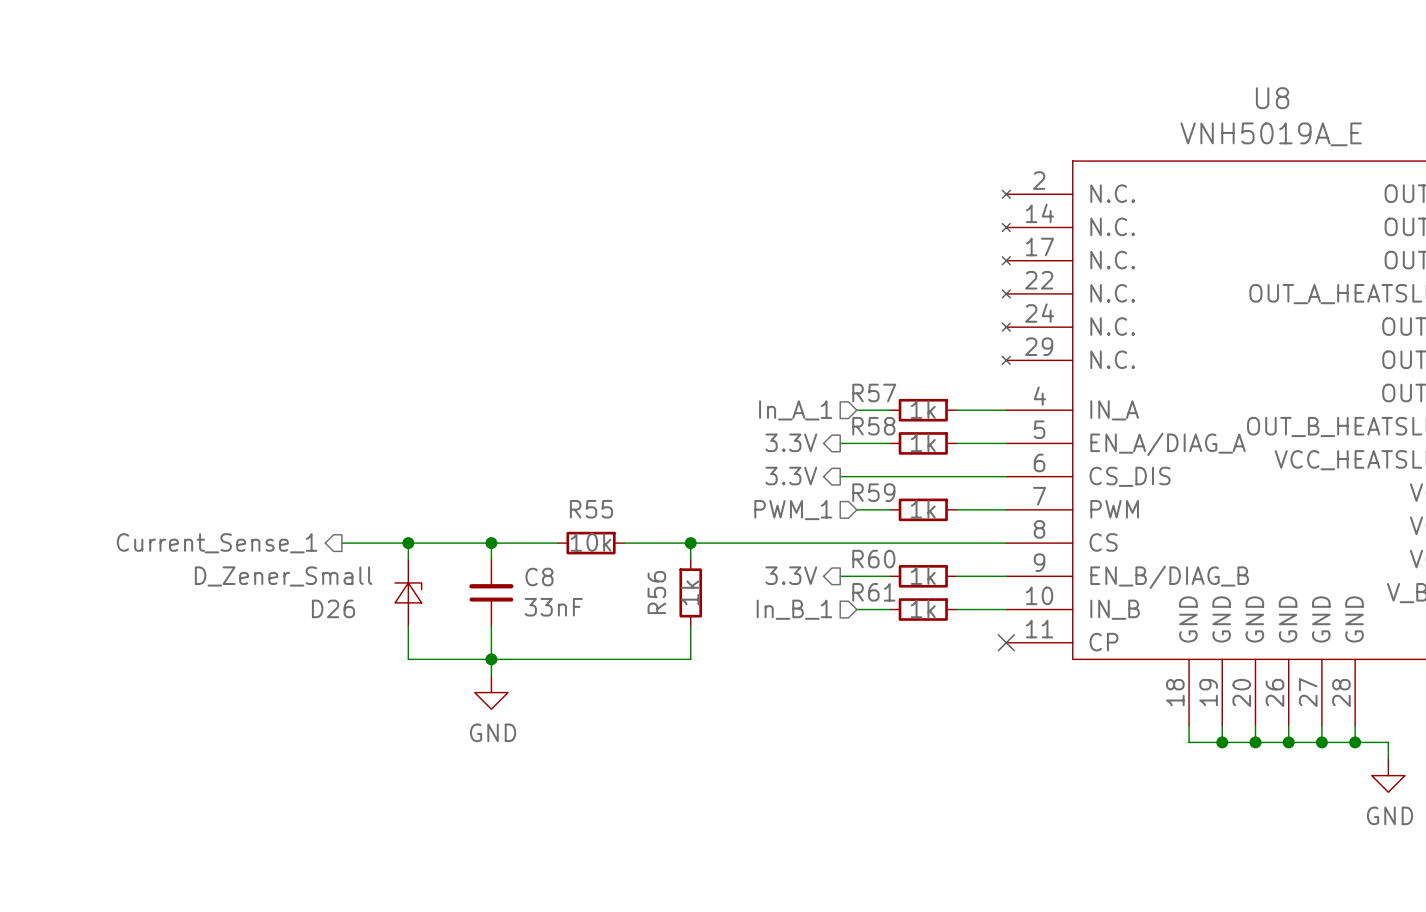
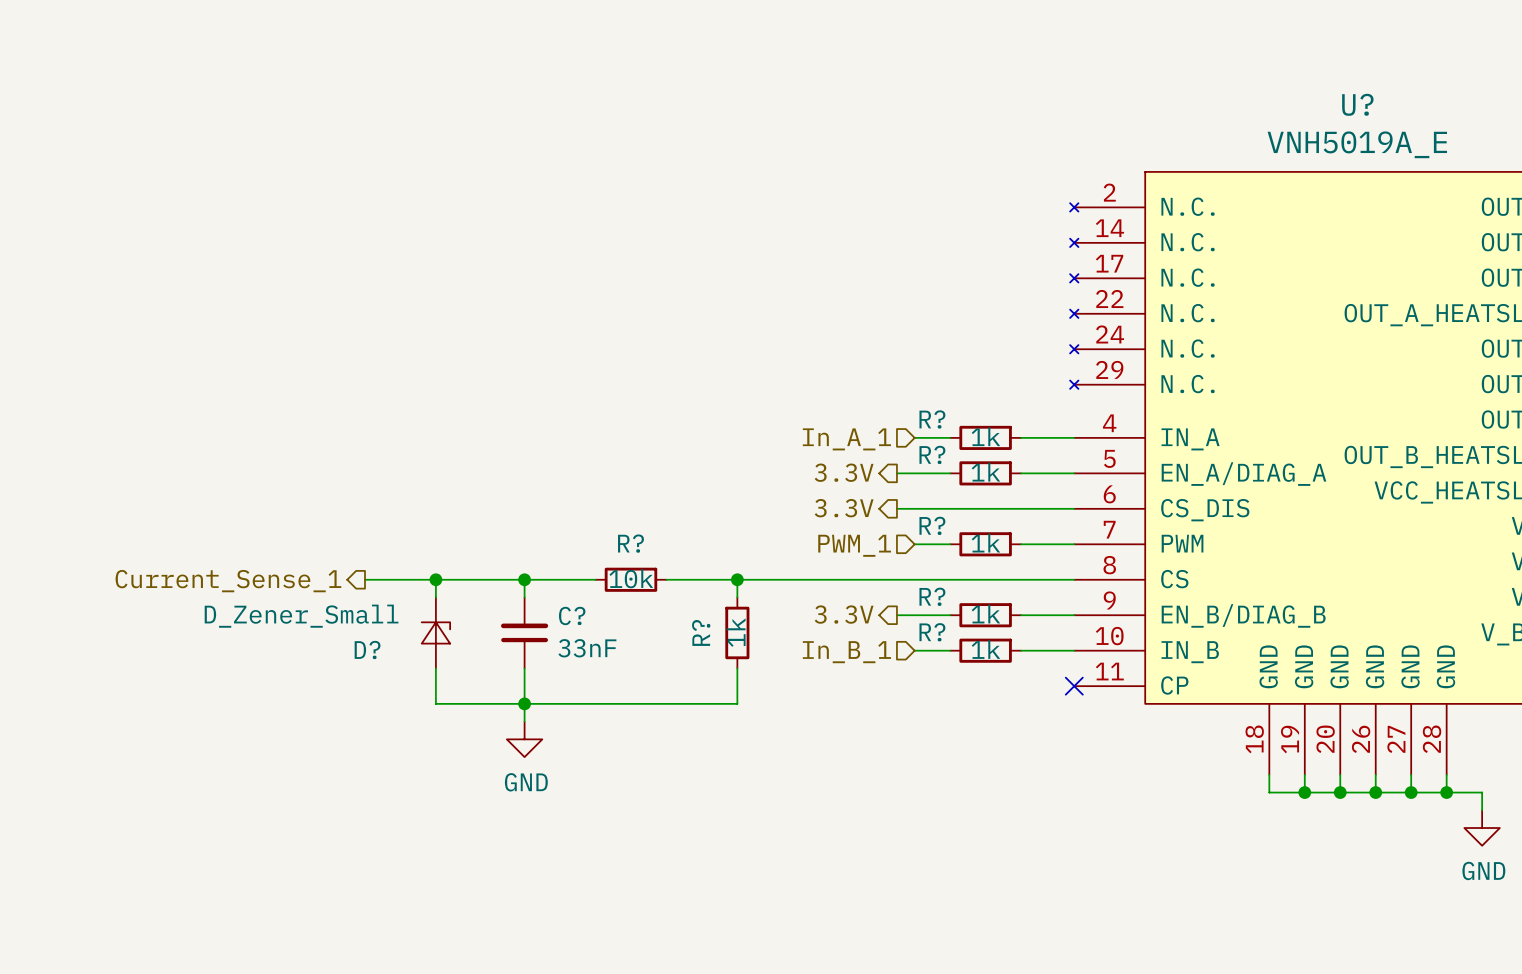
U8 name: U8 (1272, 98) -> U? (1357, 104)
R57 name: R57 (874, 392) -> R? (932, 419)
R58 name: R58 (873, 426) -> R? (932, 454)
R59 name: R59 (873, 492) -> R? (932, 525)
R55 name: R55 (591, 509) -> R? (630, 543)
R60 name: R60 (873, 559) -> R? (932, 596)
C8 name: C8 (539, 577) -> C? (572, 615)
R56 name: R56 (656, 592) -> R? (701, 632)
R61 name: R61 (873, 592) -> R? (932, 632)
D26 name: D26 (333, 608) -> D? (367, 649)

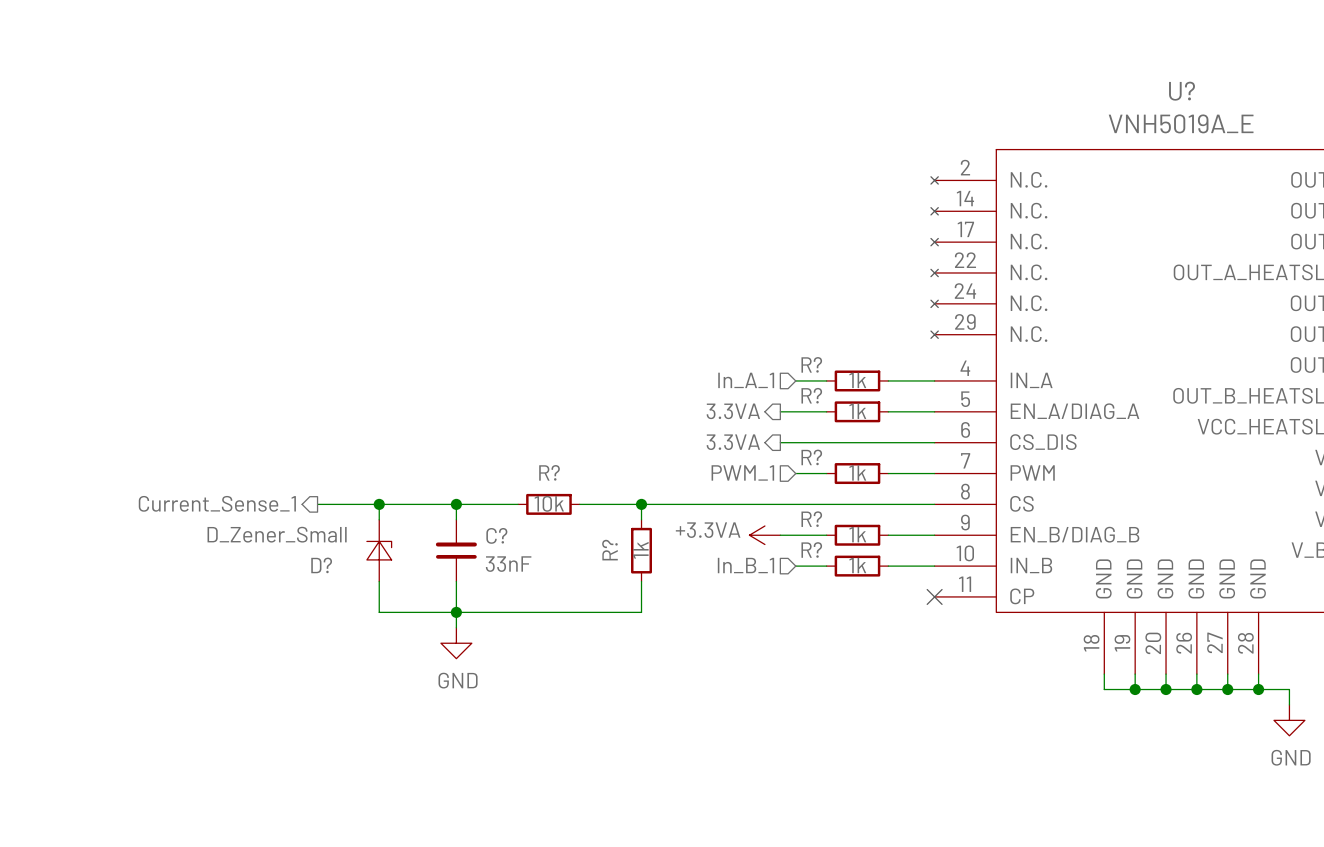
hierarchical label: 3.3V (844, 472) -> 3.3VA (733, 411)
hierarchical label: 3.3V (844, 508) -> 3.3VA (733, 442)
hierarchical label: 3.3V (844, 614) -> none
power symbol: none -> +3.3VA (764, 535)

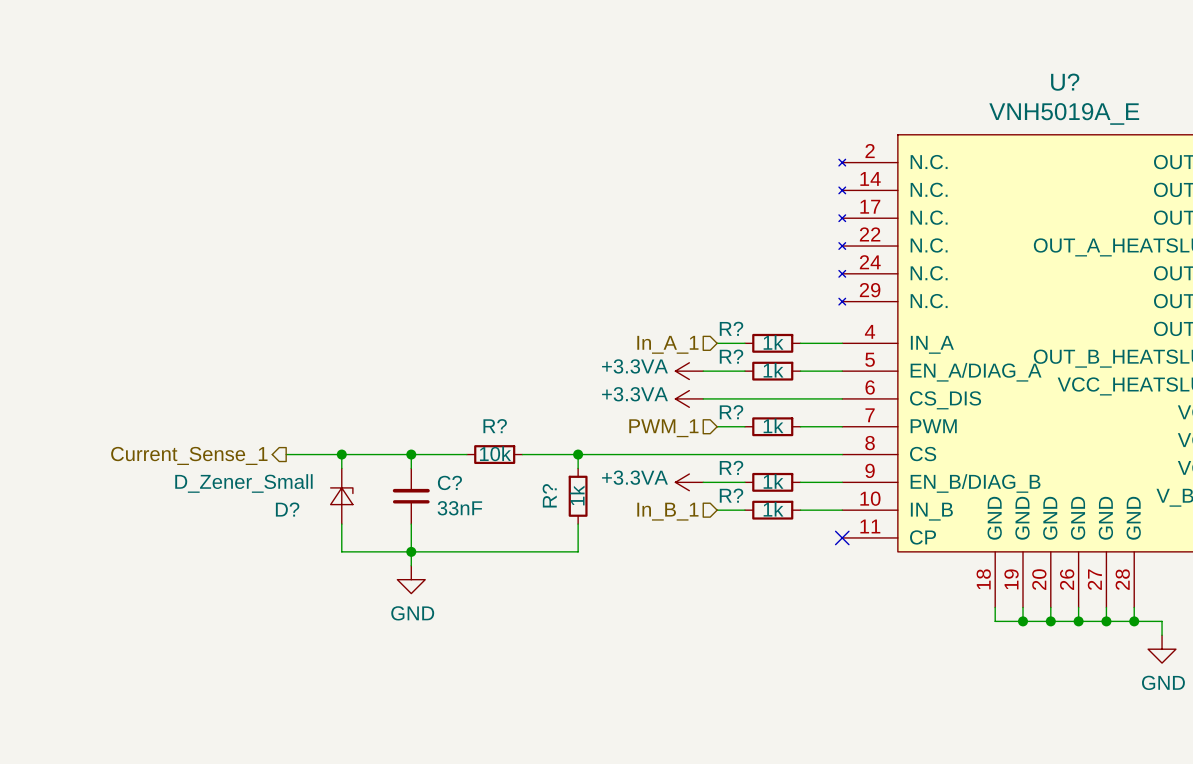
hierarchical label: 3.3VA (733, 411) -> none
power symbol: none -> +3.3VA (689, 371)
hierarchical label: 3.3VA (733, 442) -> none
power symbol: none -> +3.3VA (689, 398)

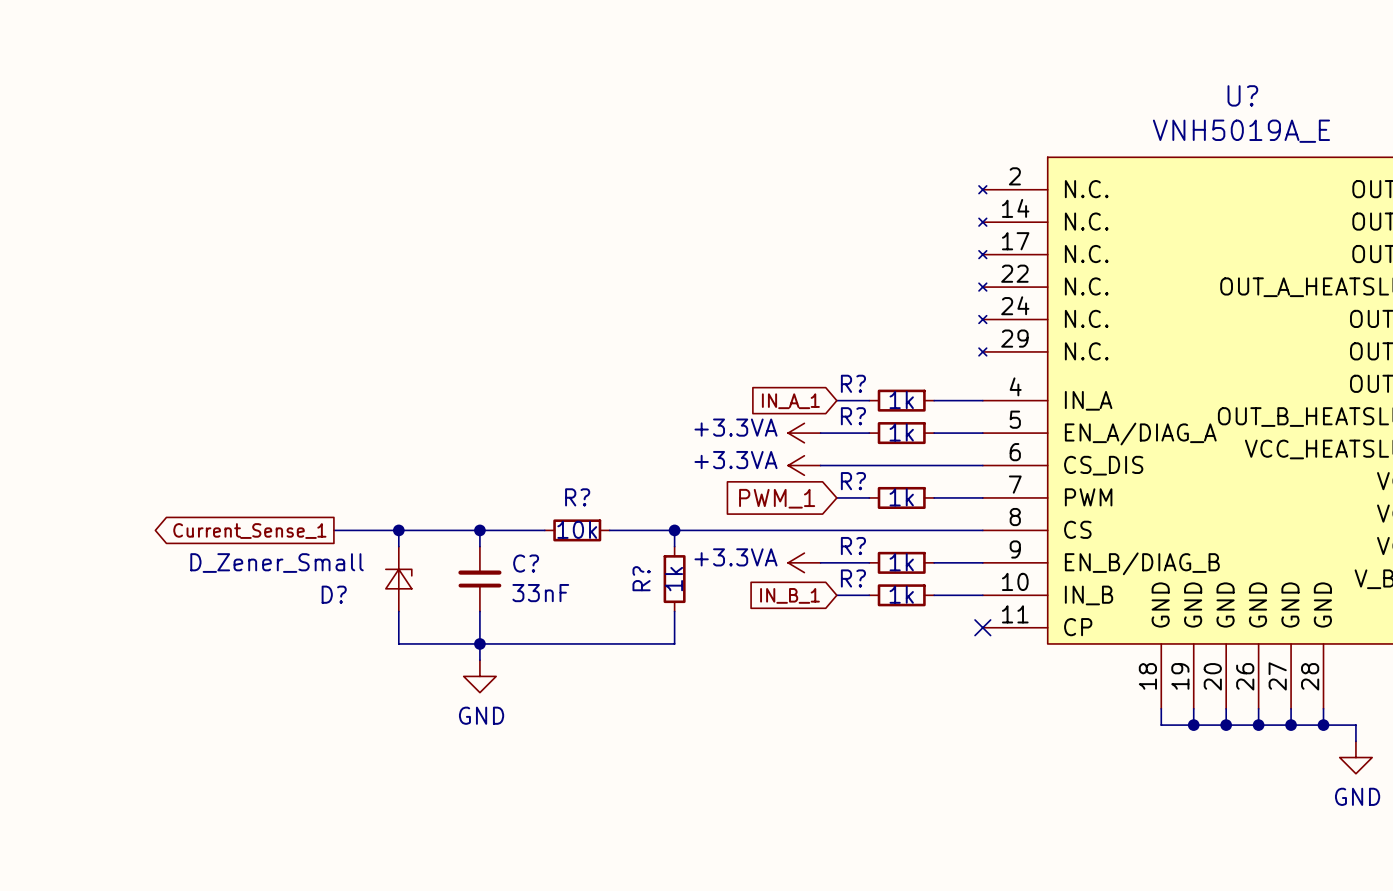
hierarchical label: In_A_1 (667, 344) -> none
global label: none -> IN_A_1 (790, 401)
hierarchical label: PWM_1 (663, 428) -> none
global label: none -> PWM_1 (777, 498)
hierarchical label: Current_Sense_1 (189, 455) -> none
global label: none -> Current_Sense_1 (249, 531)
hierarchical label: In_B_1 (667, 511) -> none
global label: none -> IN_B_1 (789, 595)

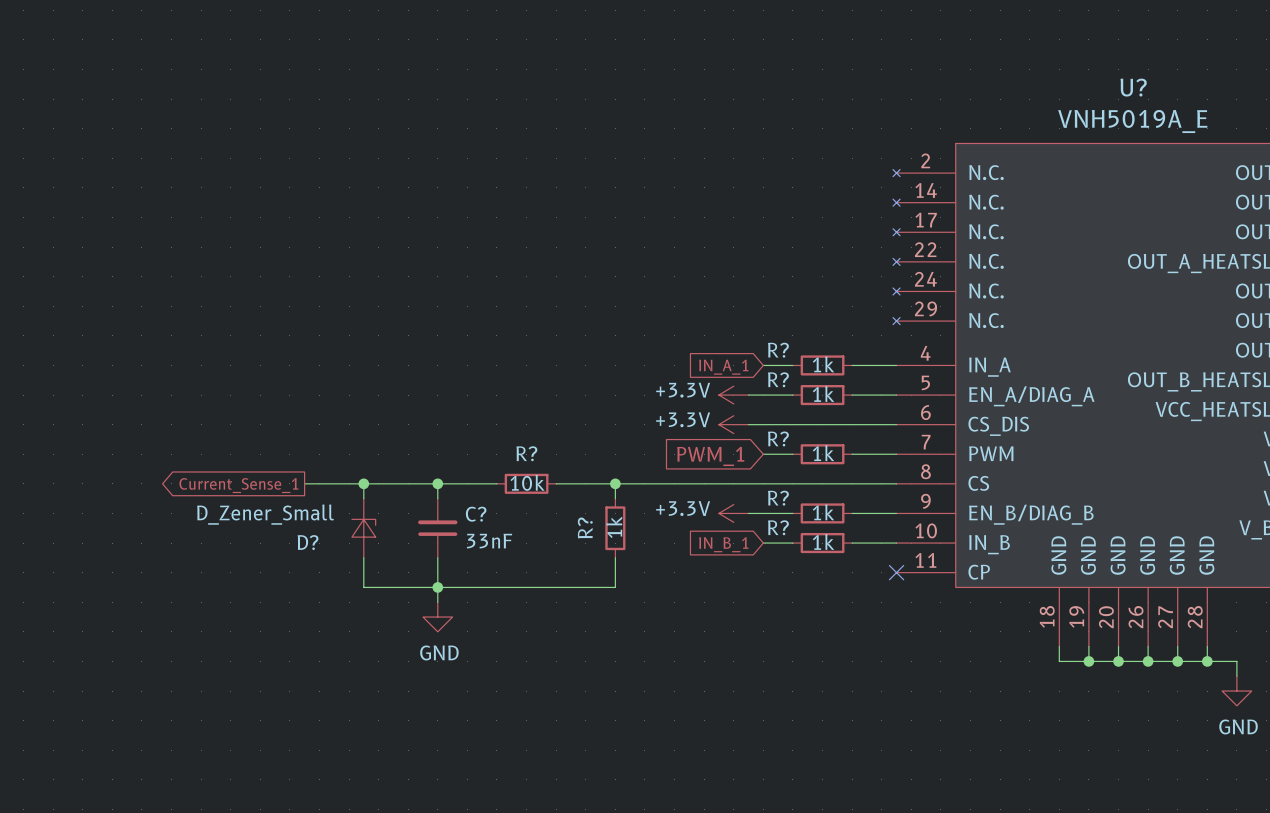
power symbol: +3.3VA (804, 433) -> +3.3V (733, 395)
power symbol: +3.3VA (804, 465) -> +3.3V (733, 424)
power symbol: +3.3VA (804, 562) -> +3.3V (733, 513)

